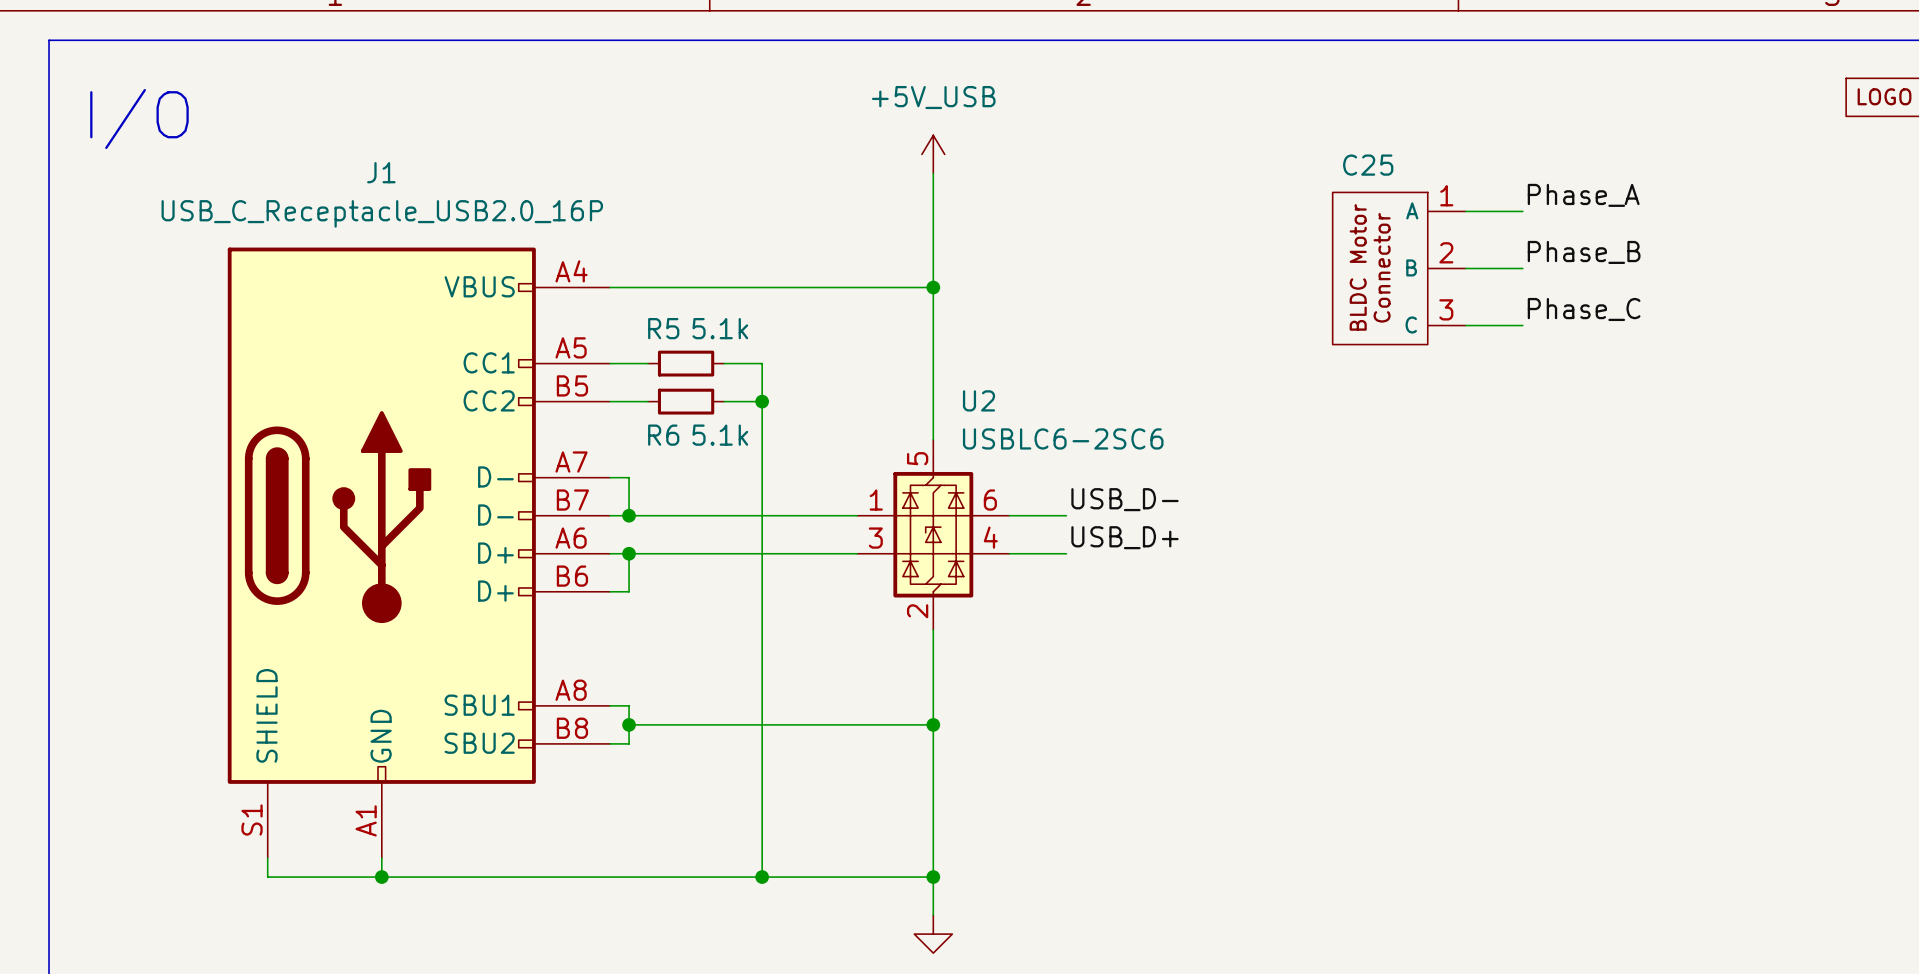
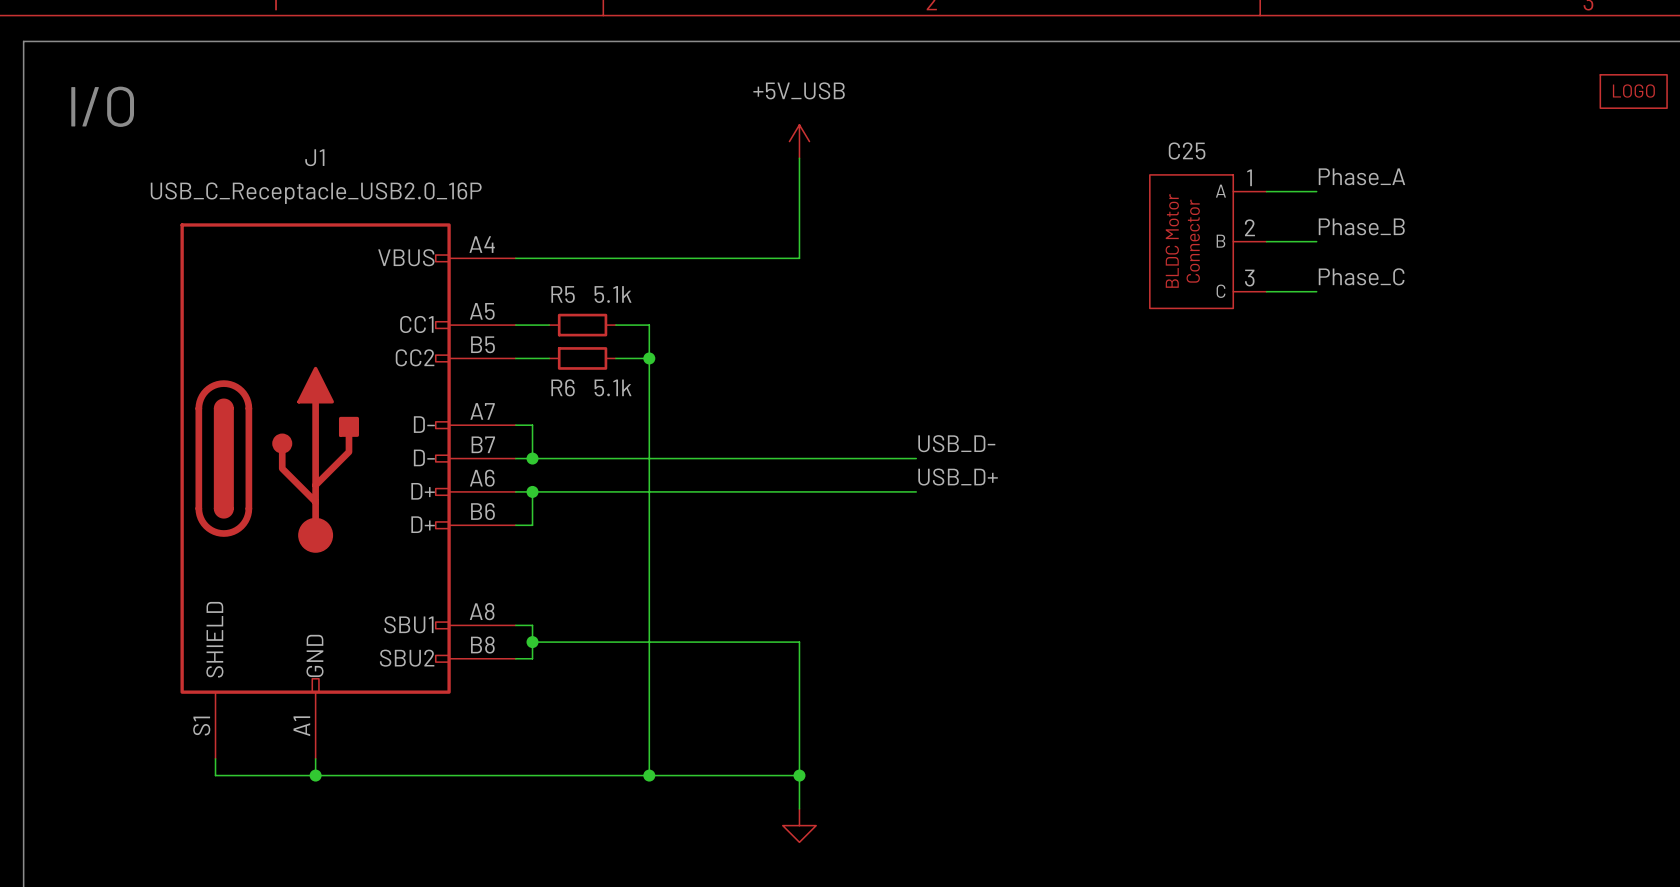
wire: (933, 287) (933, 439) -> none
junction: (933, 287) -> none
U2: USBLC6-2SC6 (933, 534) -> none
wire: (933, 629) (933, 724) -> none
junction: (933, 724) -> none

